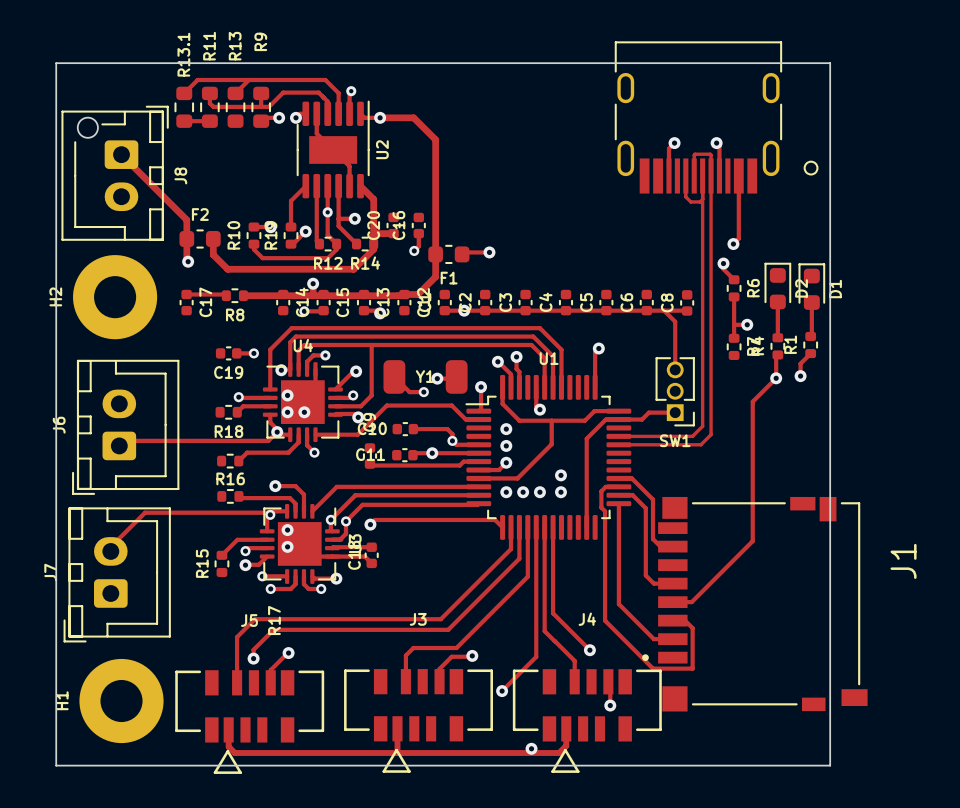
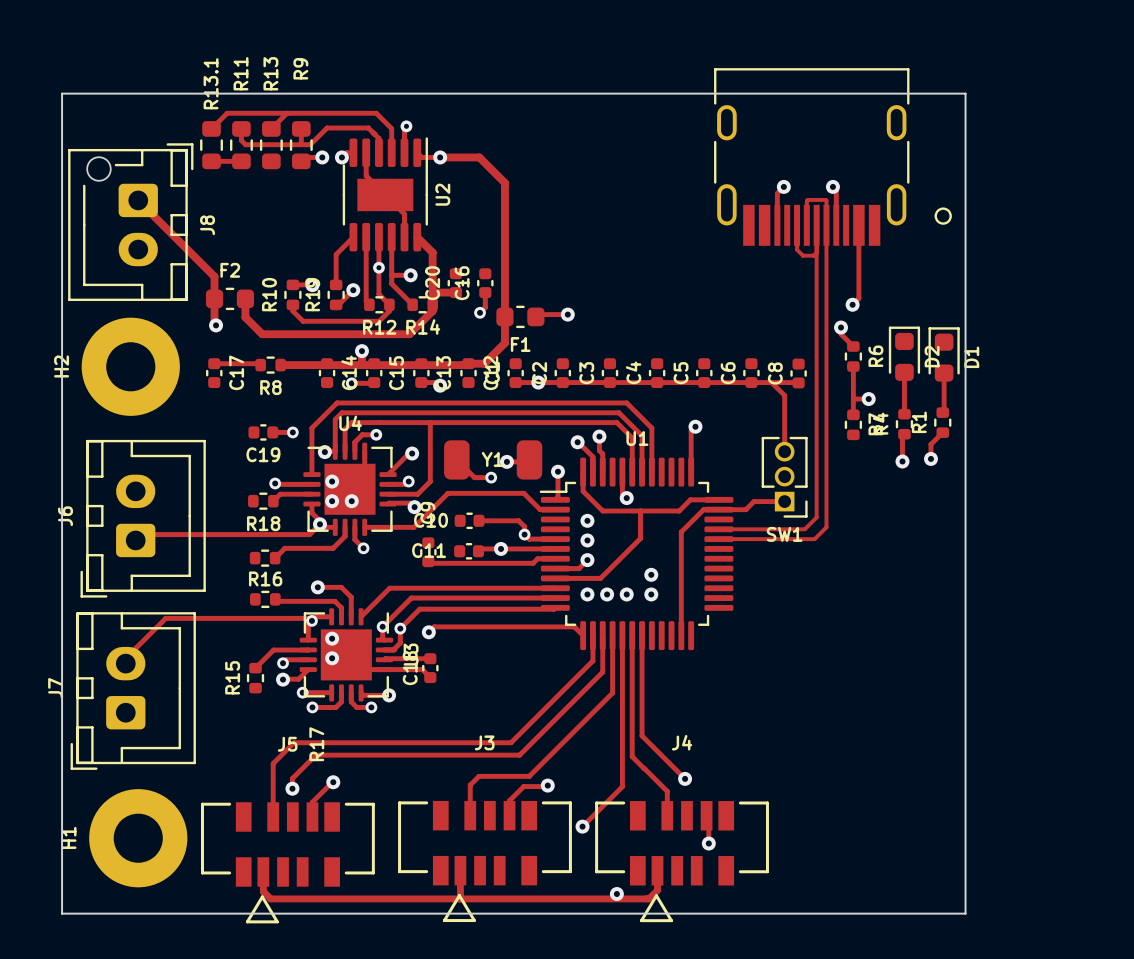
track: (776, 378) (752, 401) (752, 541) (691, 602) (672, 602) -> none
track: (618, 478) (631, 478) (653, 499) (653, 539) (661, 547) (672, 546) -> none
track: (618, 486) (605, 486) (601, 491) (601, 507) (605, 511) (605, 620) (653, 668) (692, 668) (692, 628) (685, 620) (672, 620) -> none
track: (618, 495) (632, 495) (645, 508) (645, 575) (653, 583) (672, 583) -> none
track: (618, 503) (618, 604) (653, 639) (672, 639) -> none
J1: (754, 604) -> none

